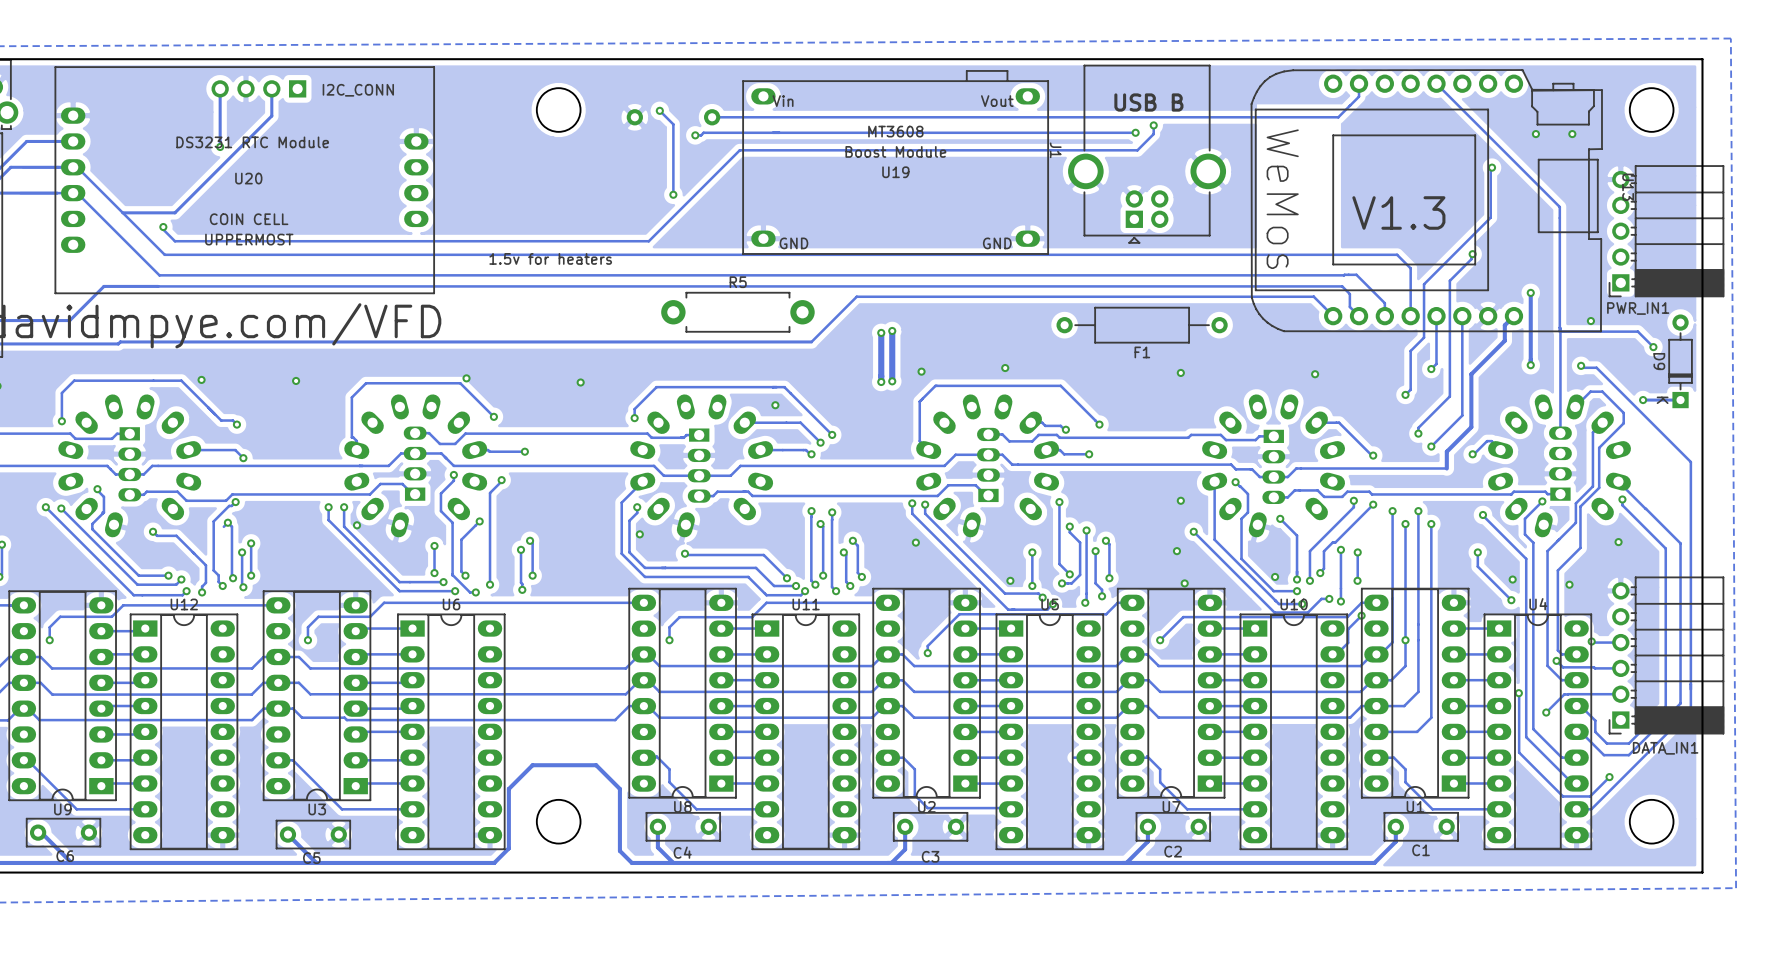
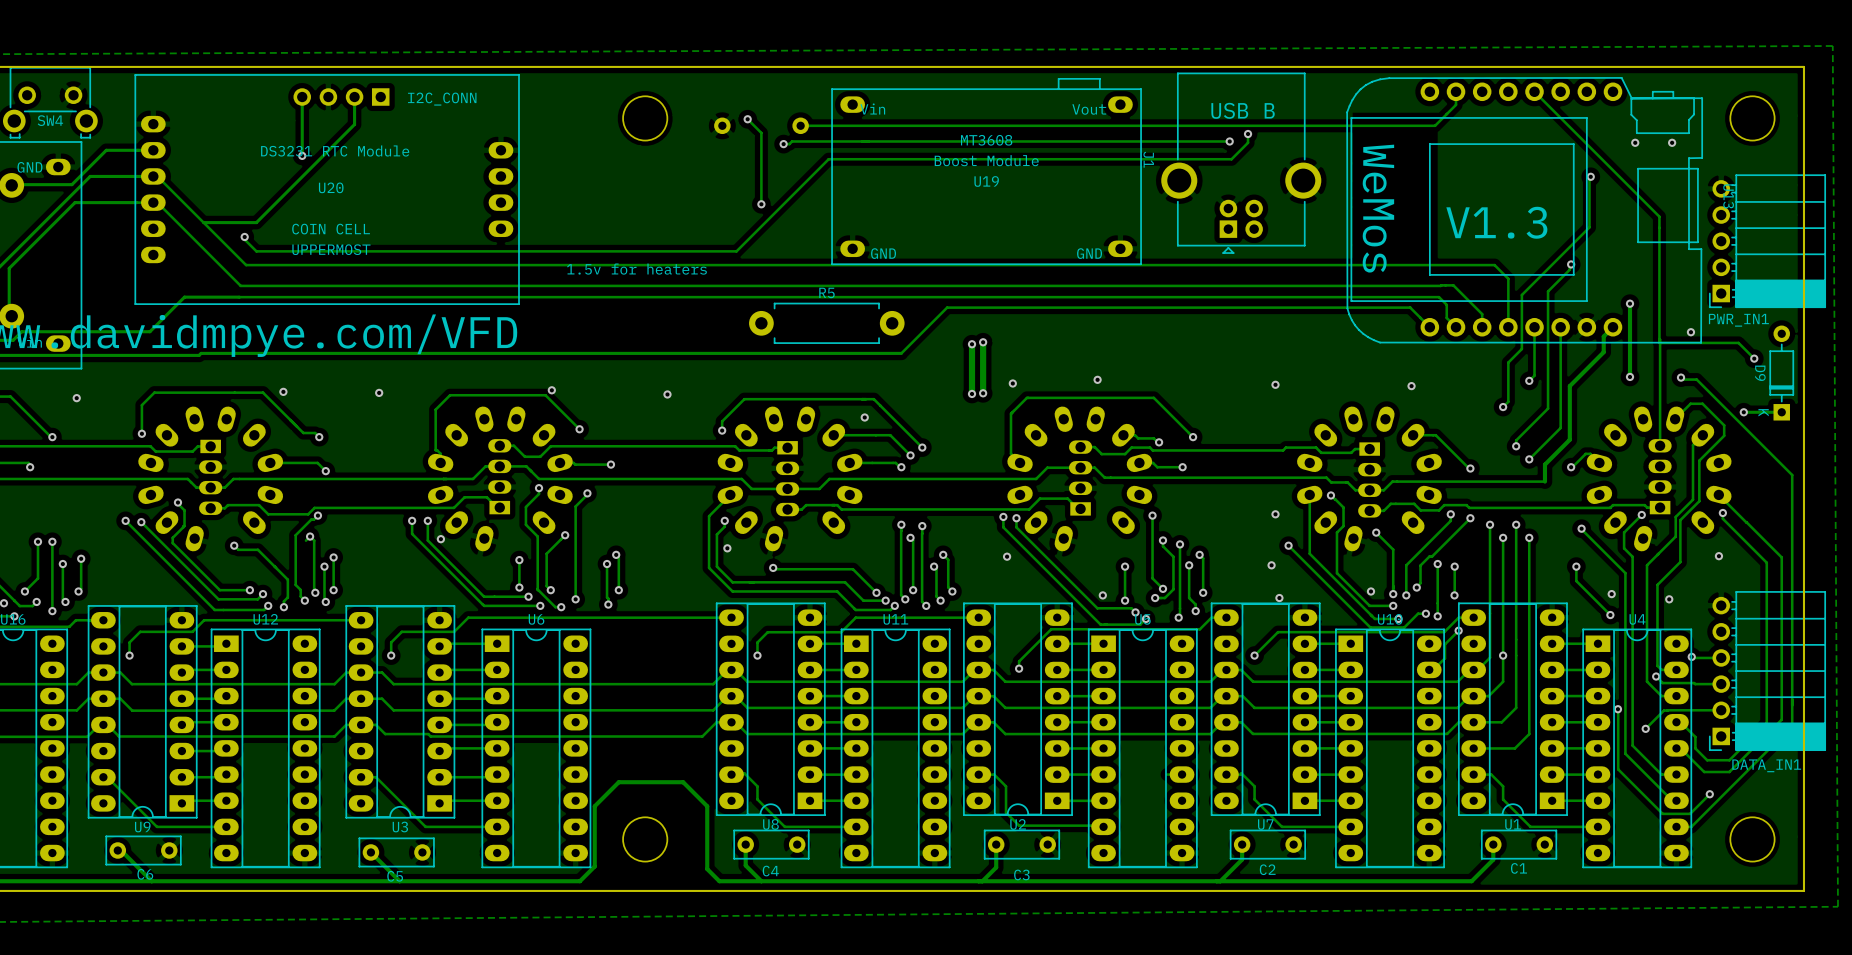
F1: (1142, 325) -> none

